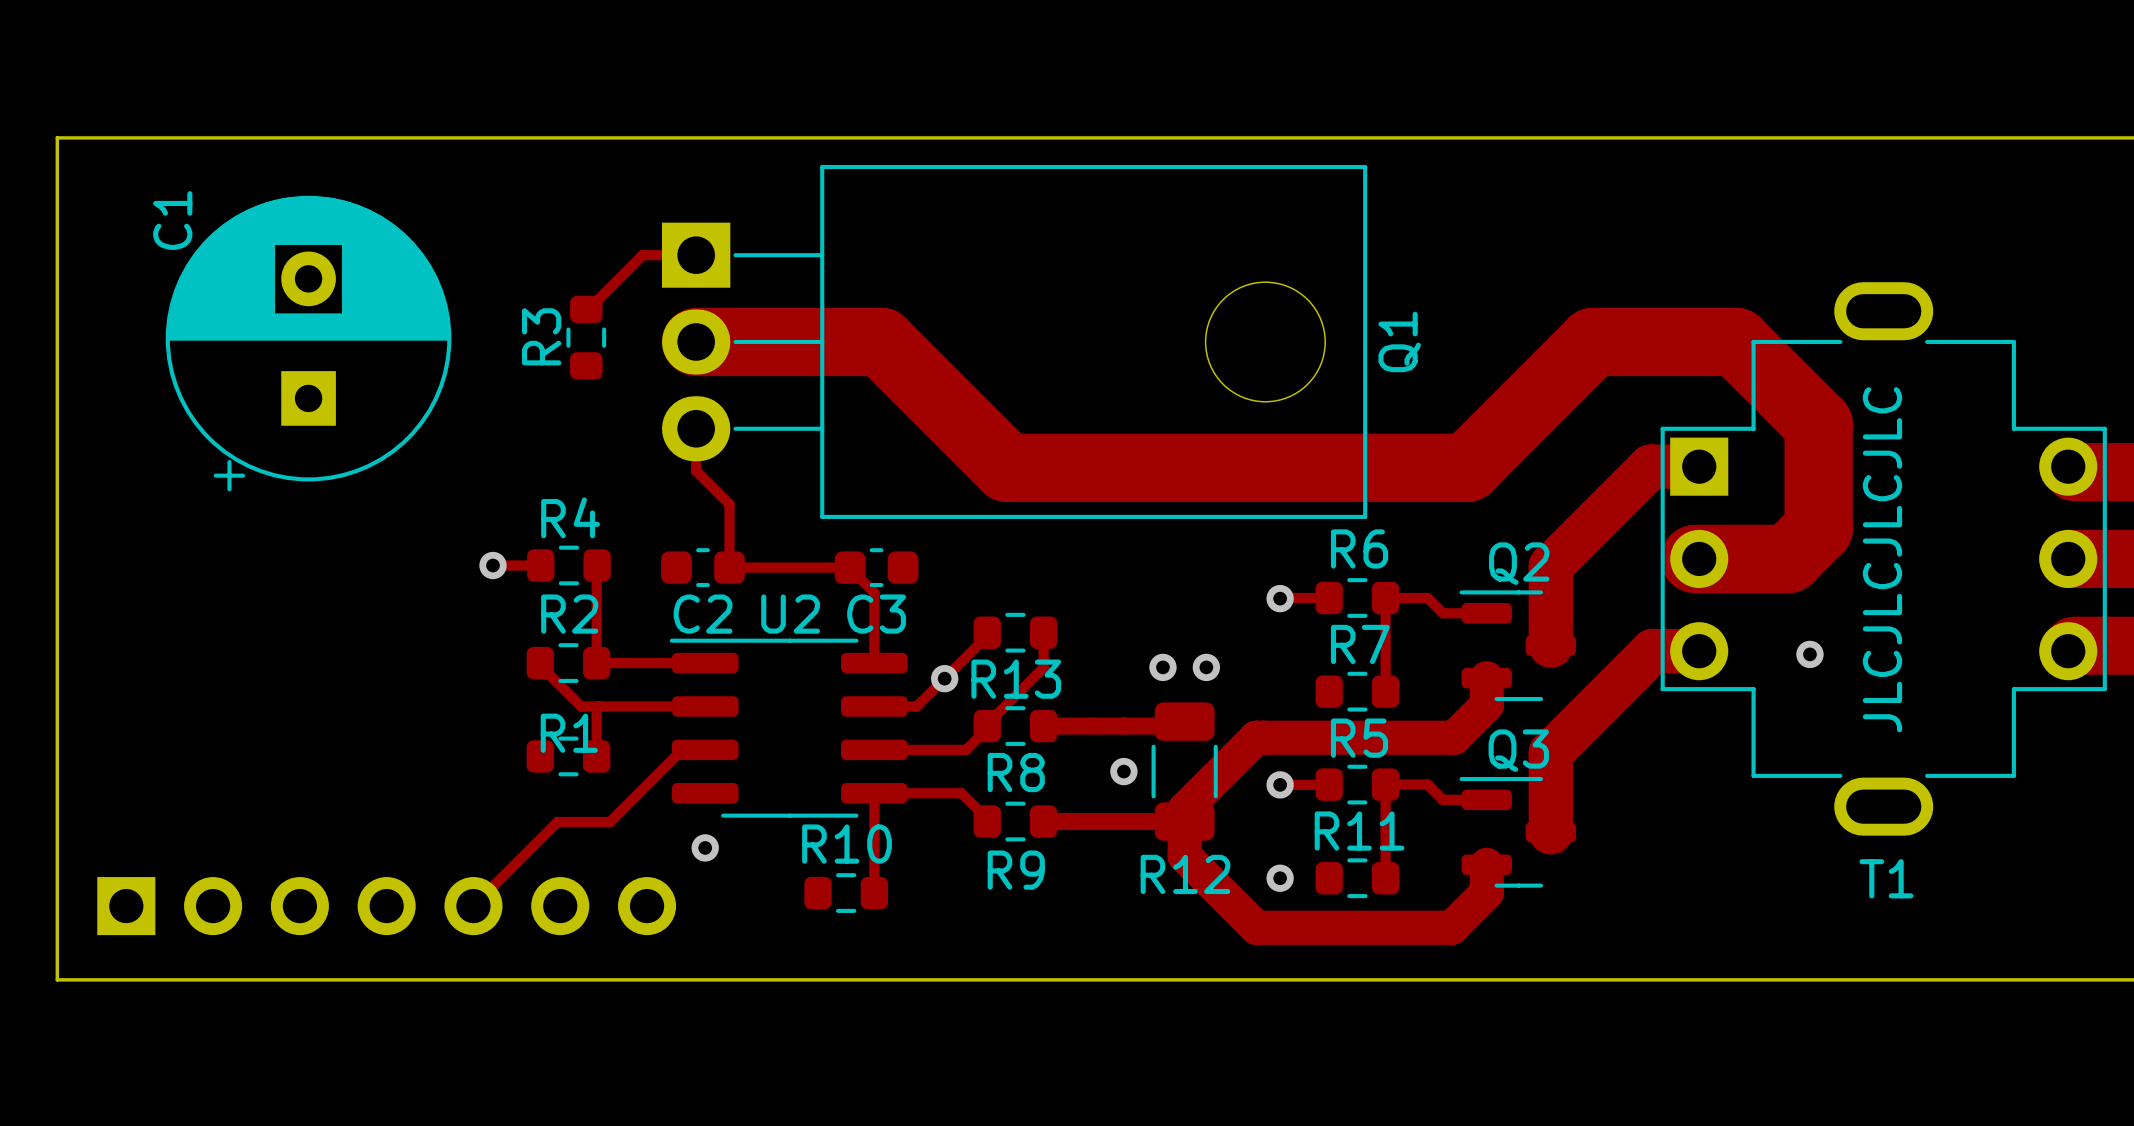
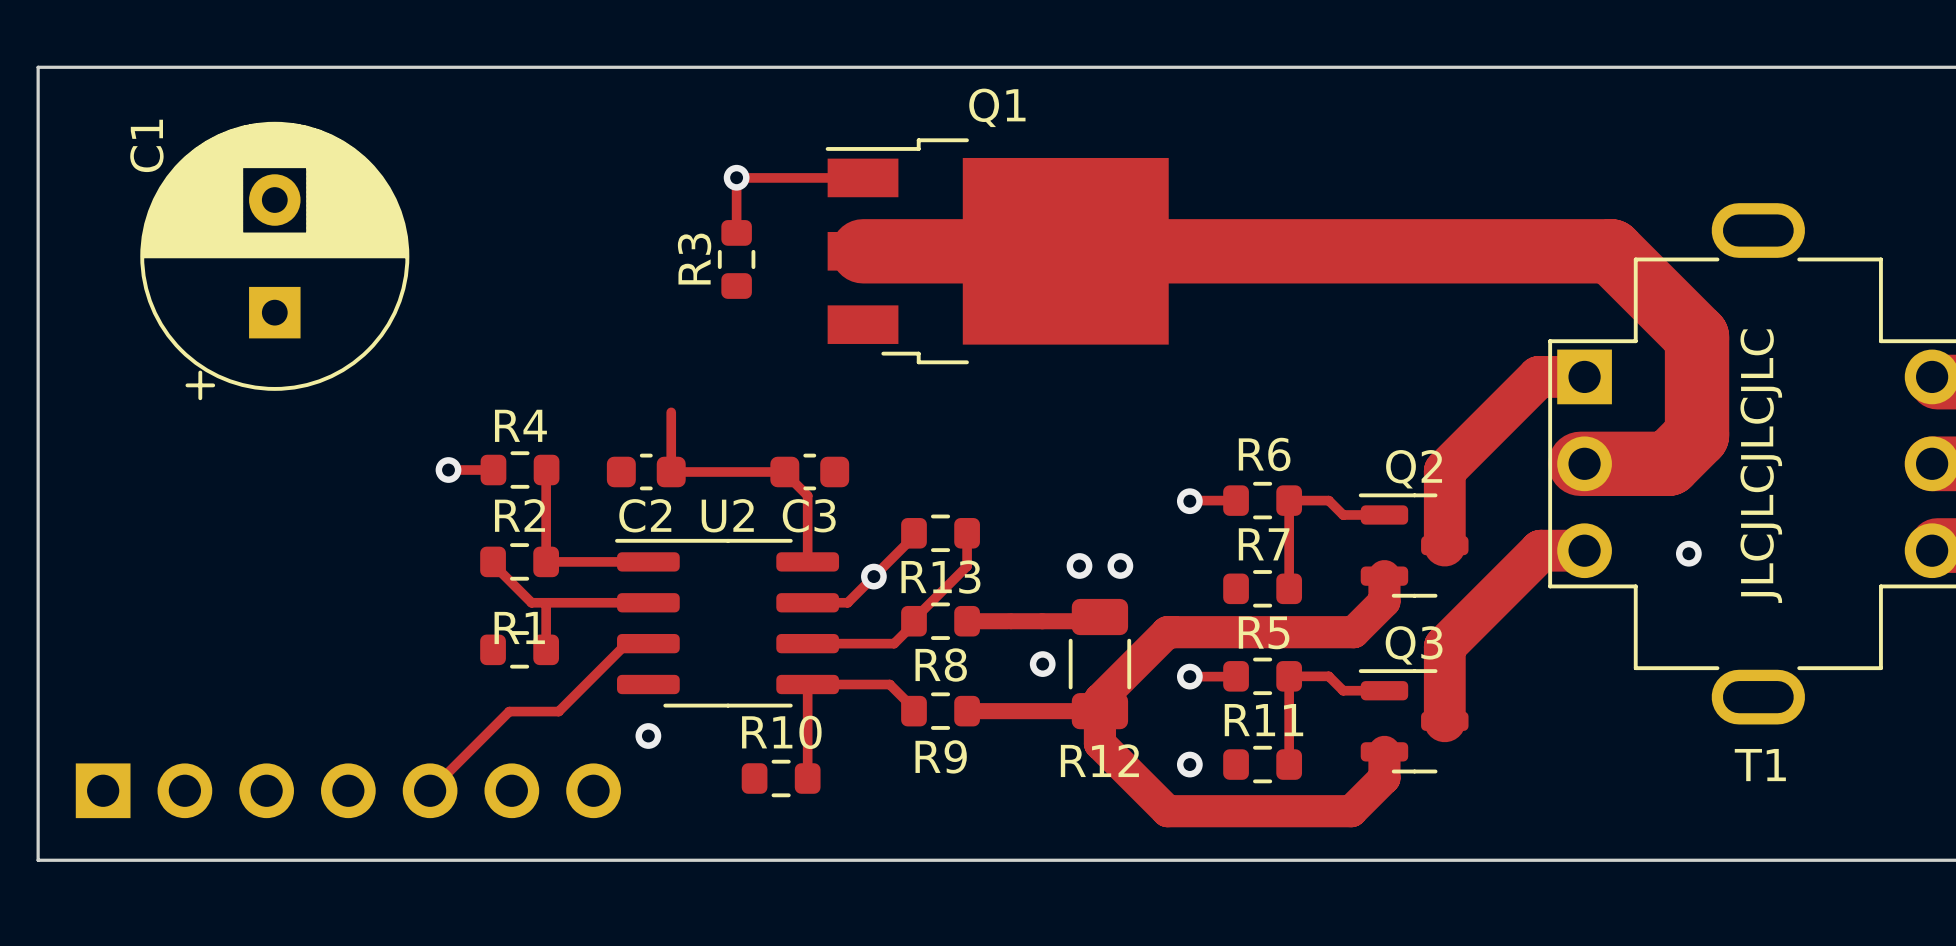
Q1 footprint: [662, 164, 1368, 519] -> [825, 138, 1169, 365]
track: (696, 255) (642, 255) (586, 311) -> none
track: none -> (736, 177) (736, 232)
via: none -> (736, 177)
track: none -> (736, 177) (863, 177)
R3 position: (586, 337) -> (736, 259)
track: (696, 341) (881, 341) (1007, 467) (1467, 467) (1593, 341) (1736, 341) -> (863, 251) (1611, 251) (1619, 259)
Q1 name position: Q1 (1399, 341) -> Q1 (997, 107)
track: (696, 428) (696, 470) (729, 504) -> none

